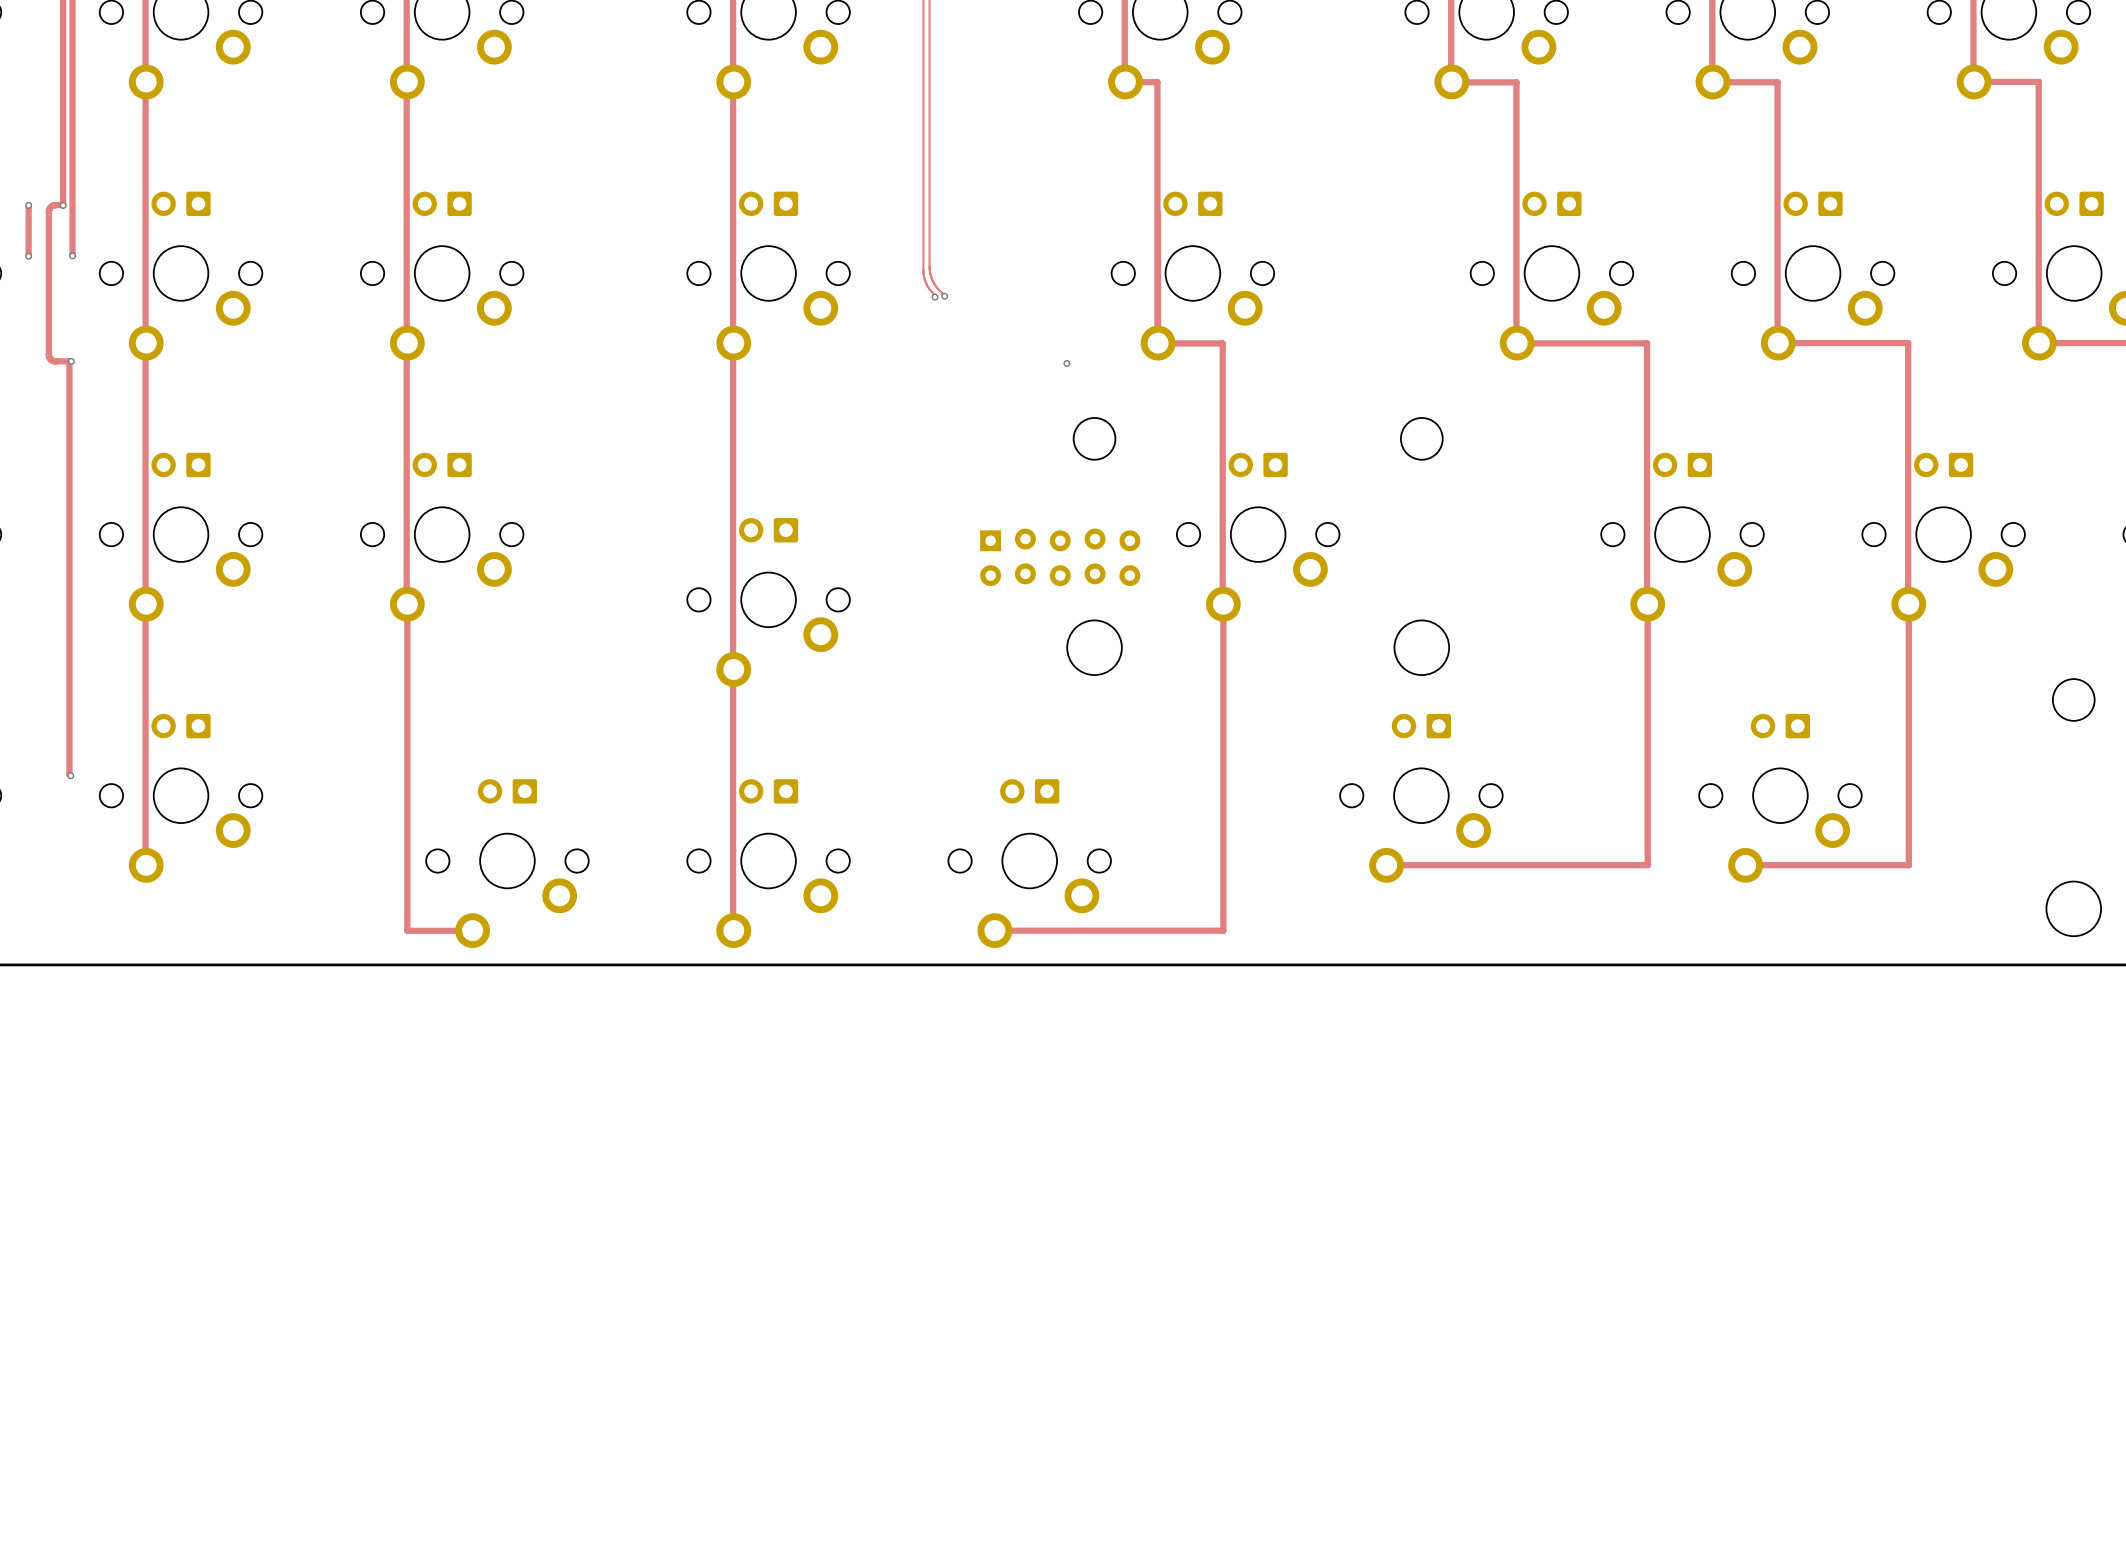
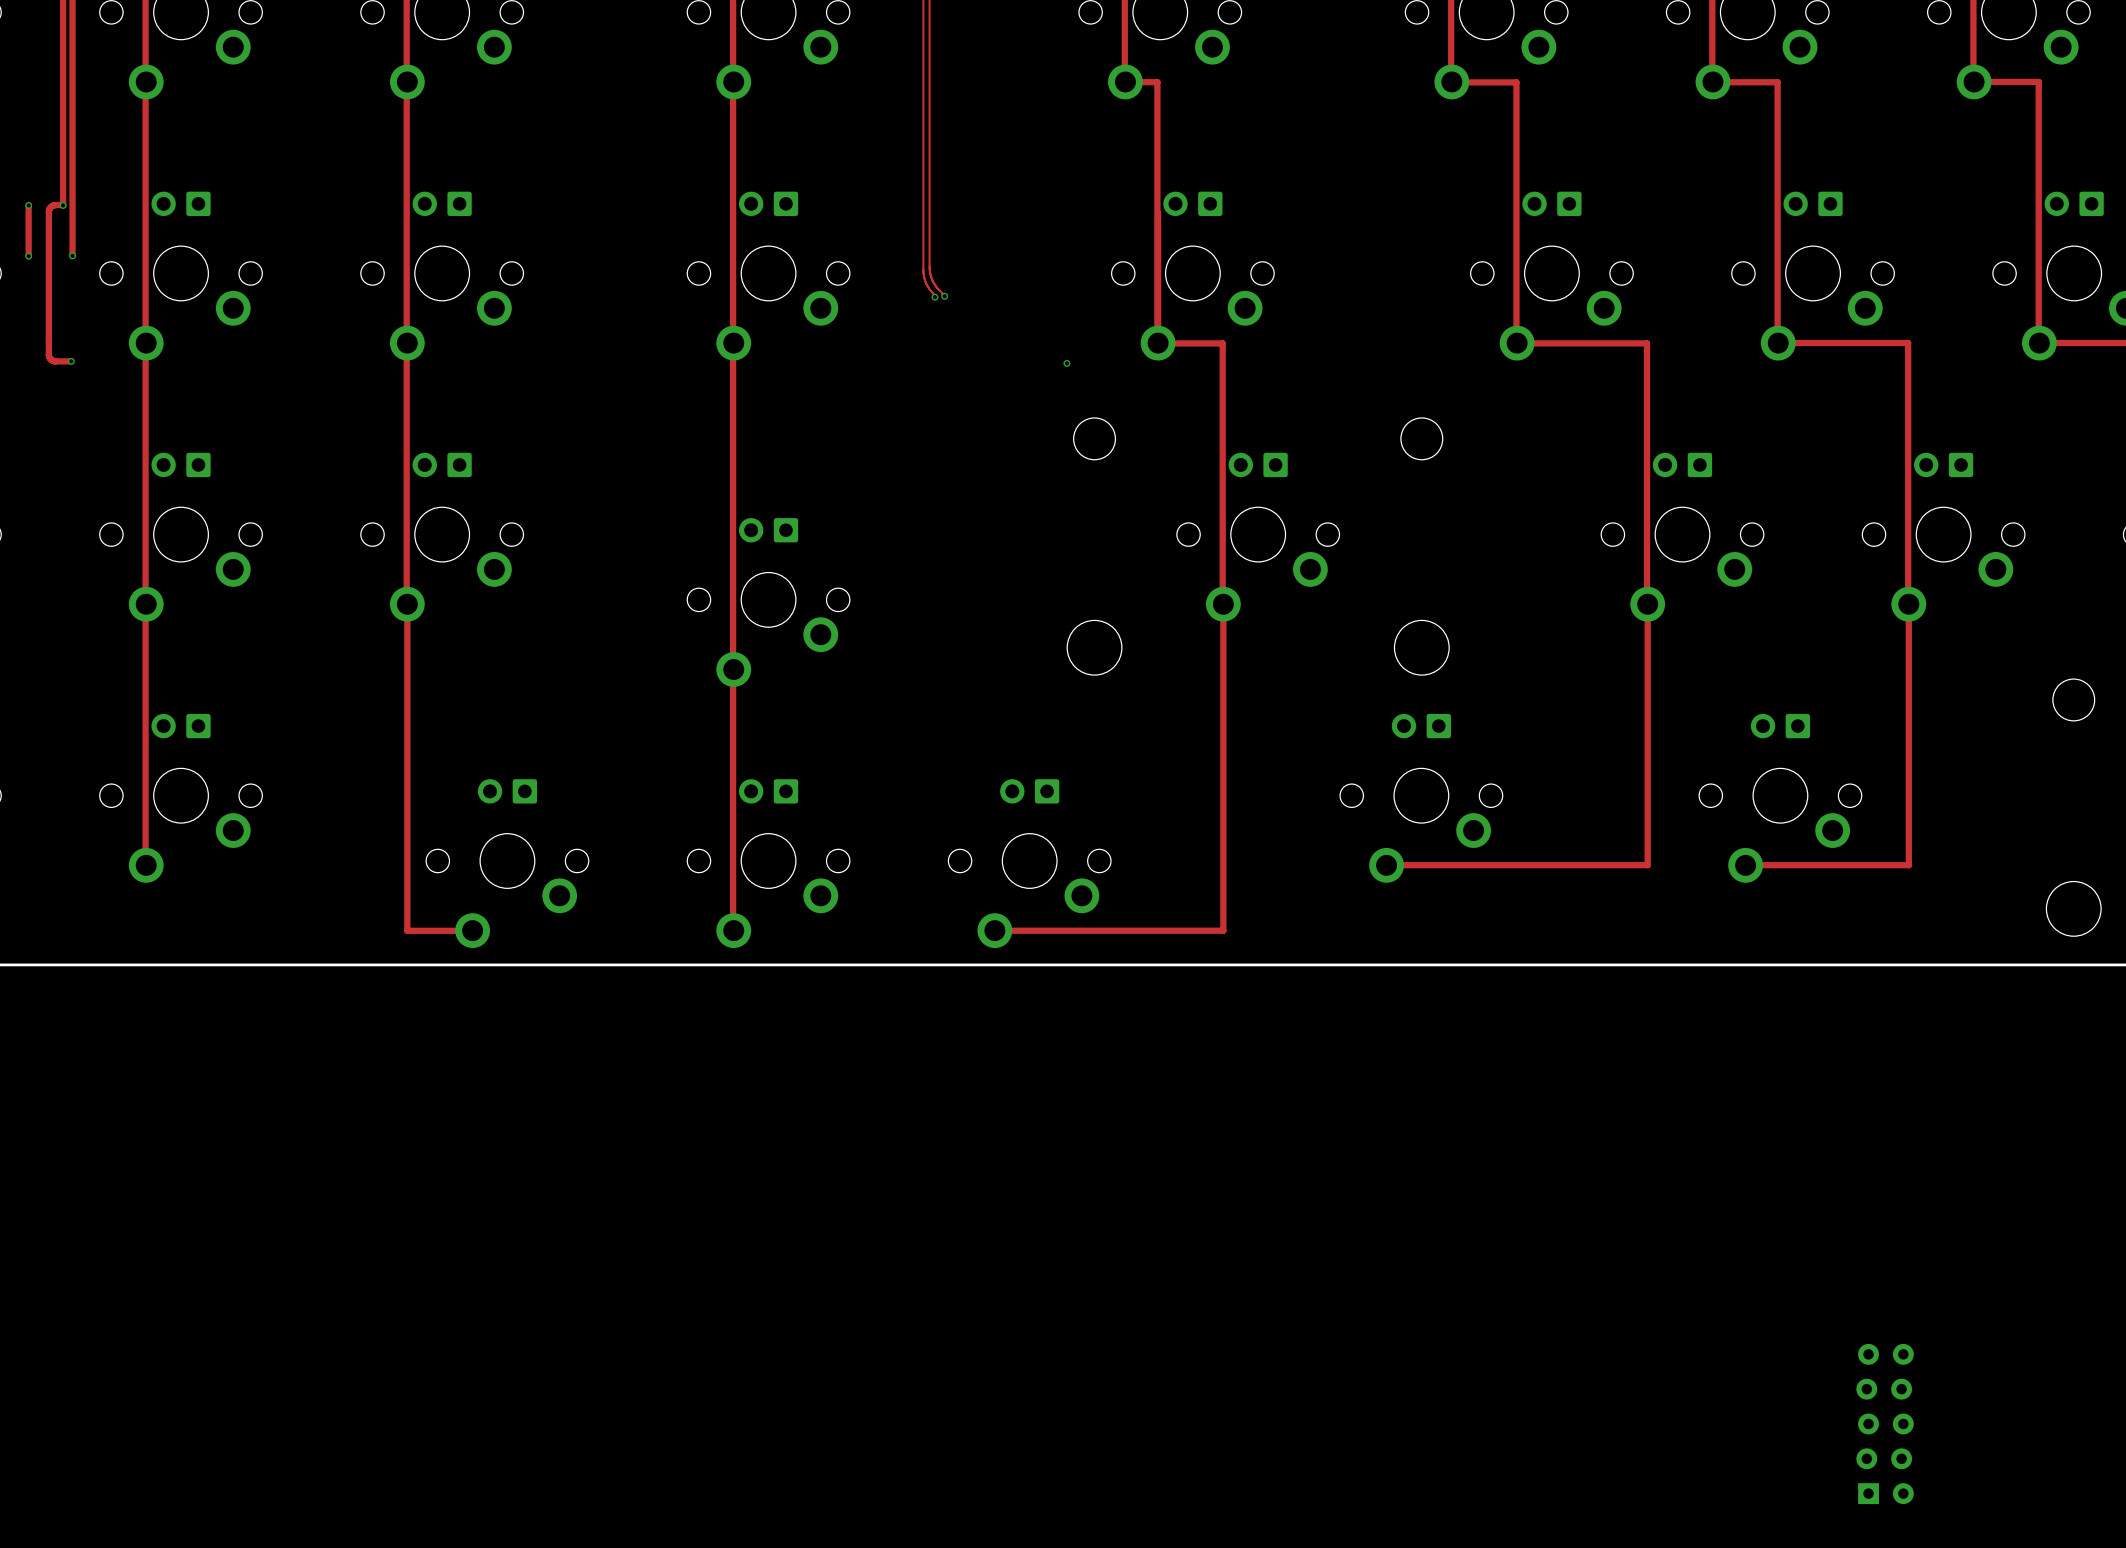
track: (69, 361) (70, 775) -> none
part: (1060, 557) -> none
via: (70, 775) -> none
part: none -> (1885, 1423)

